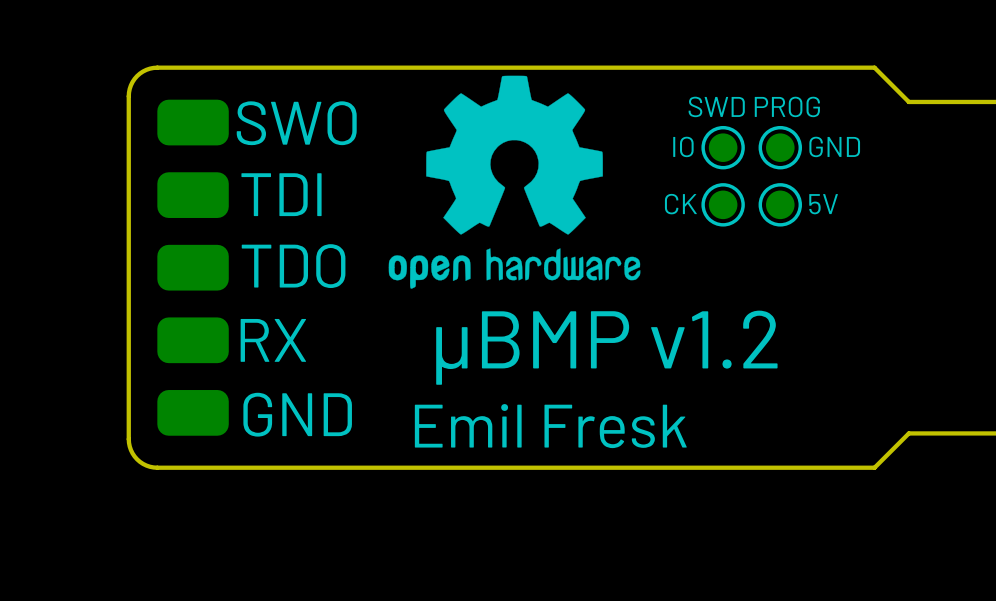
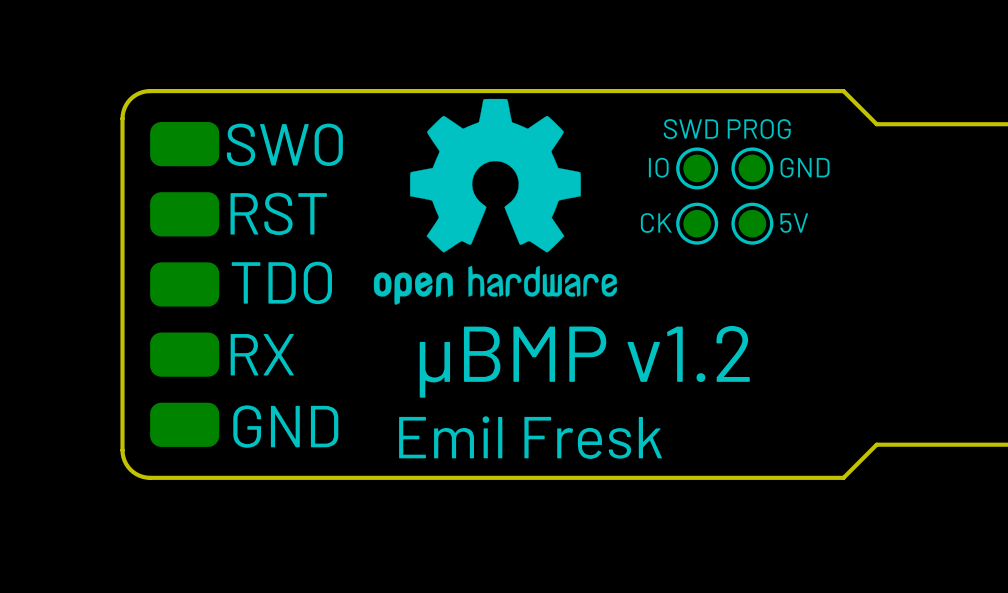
text: TDI (281, 194) -> RST (278, 213)

